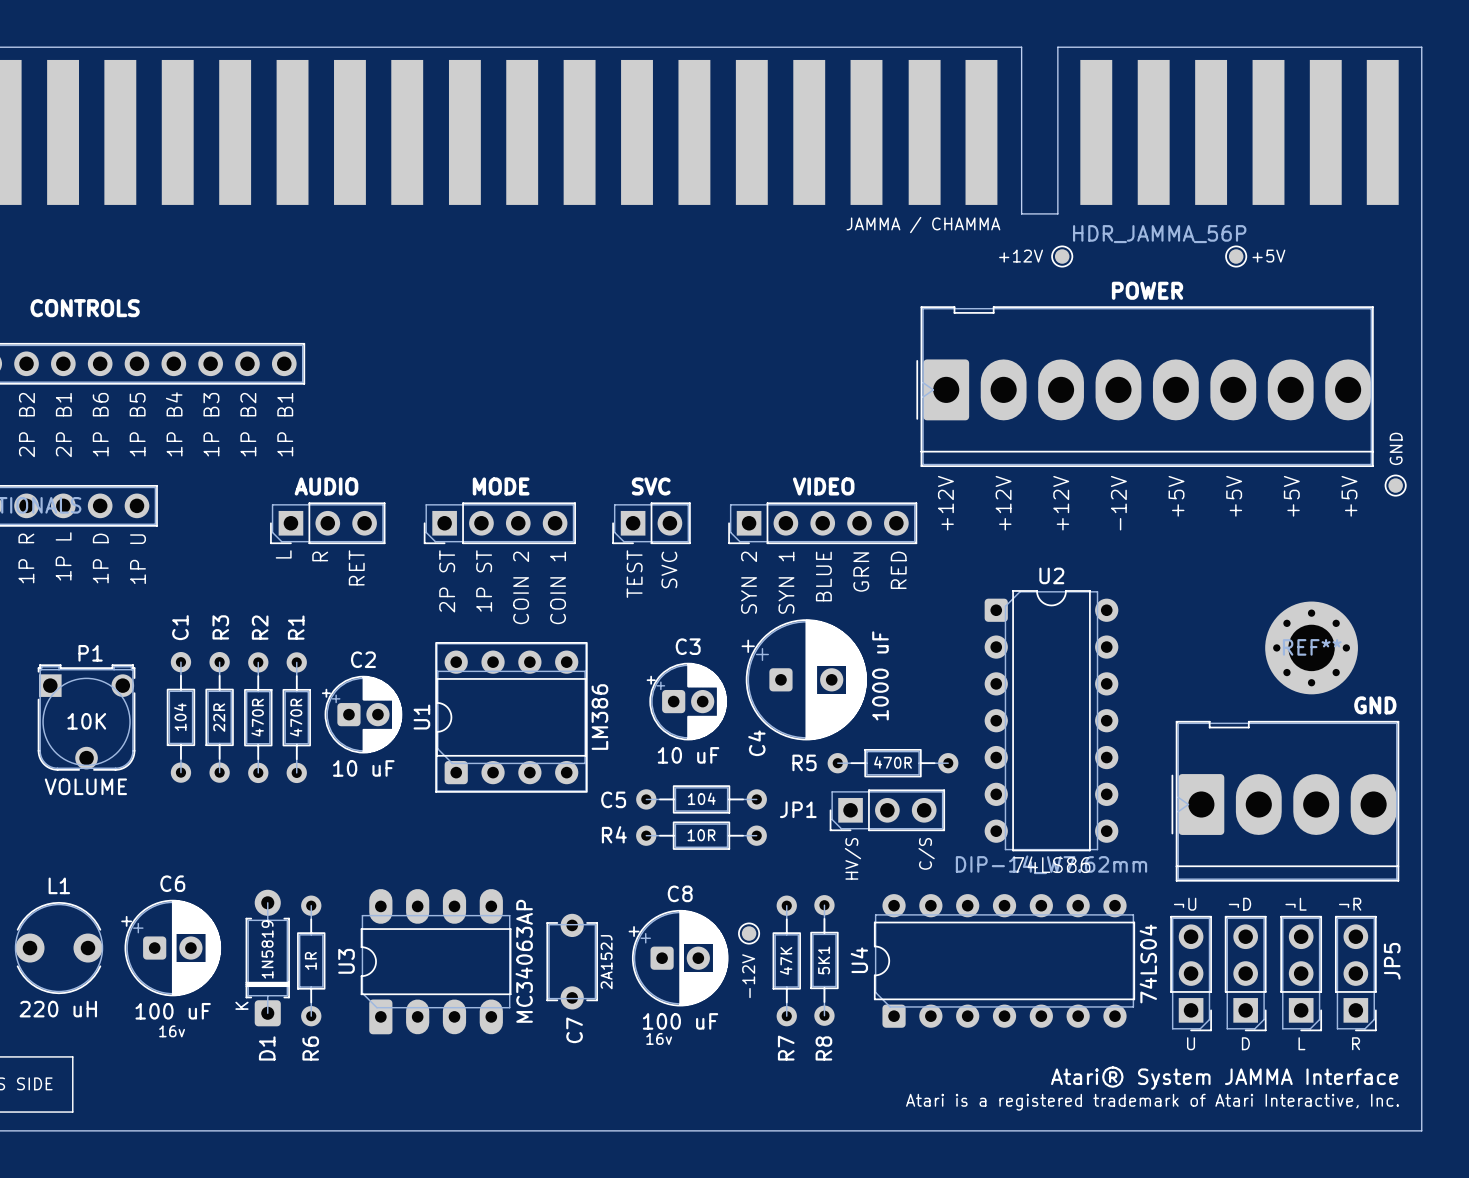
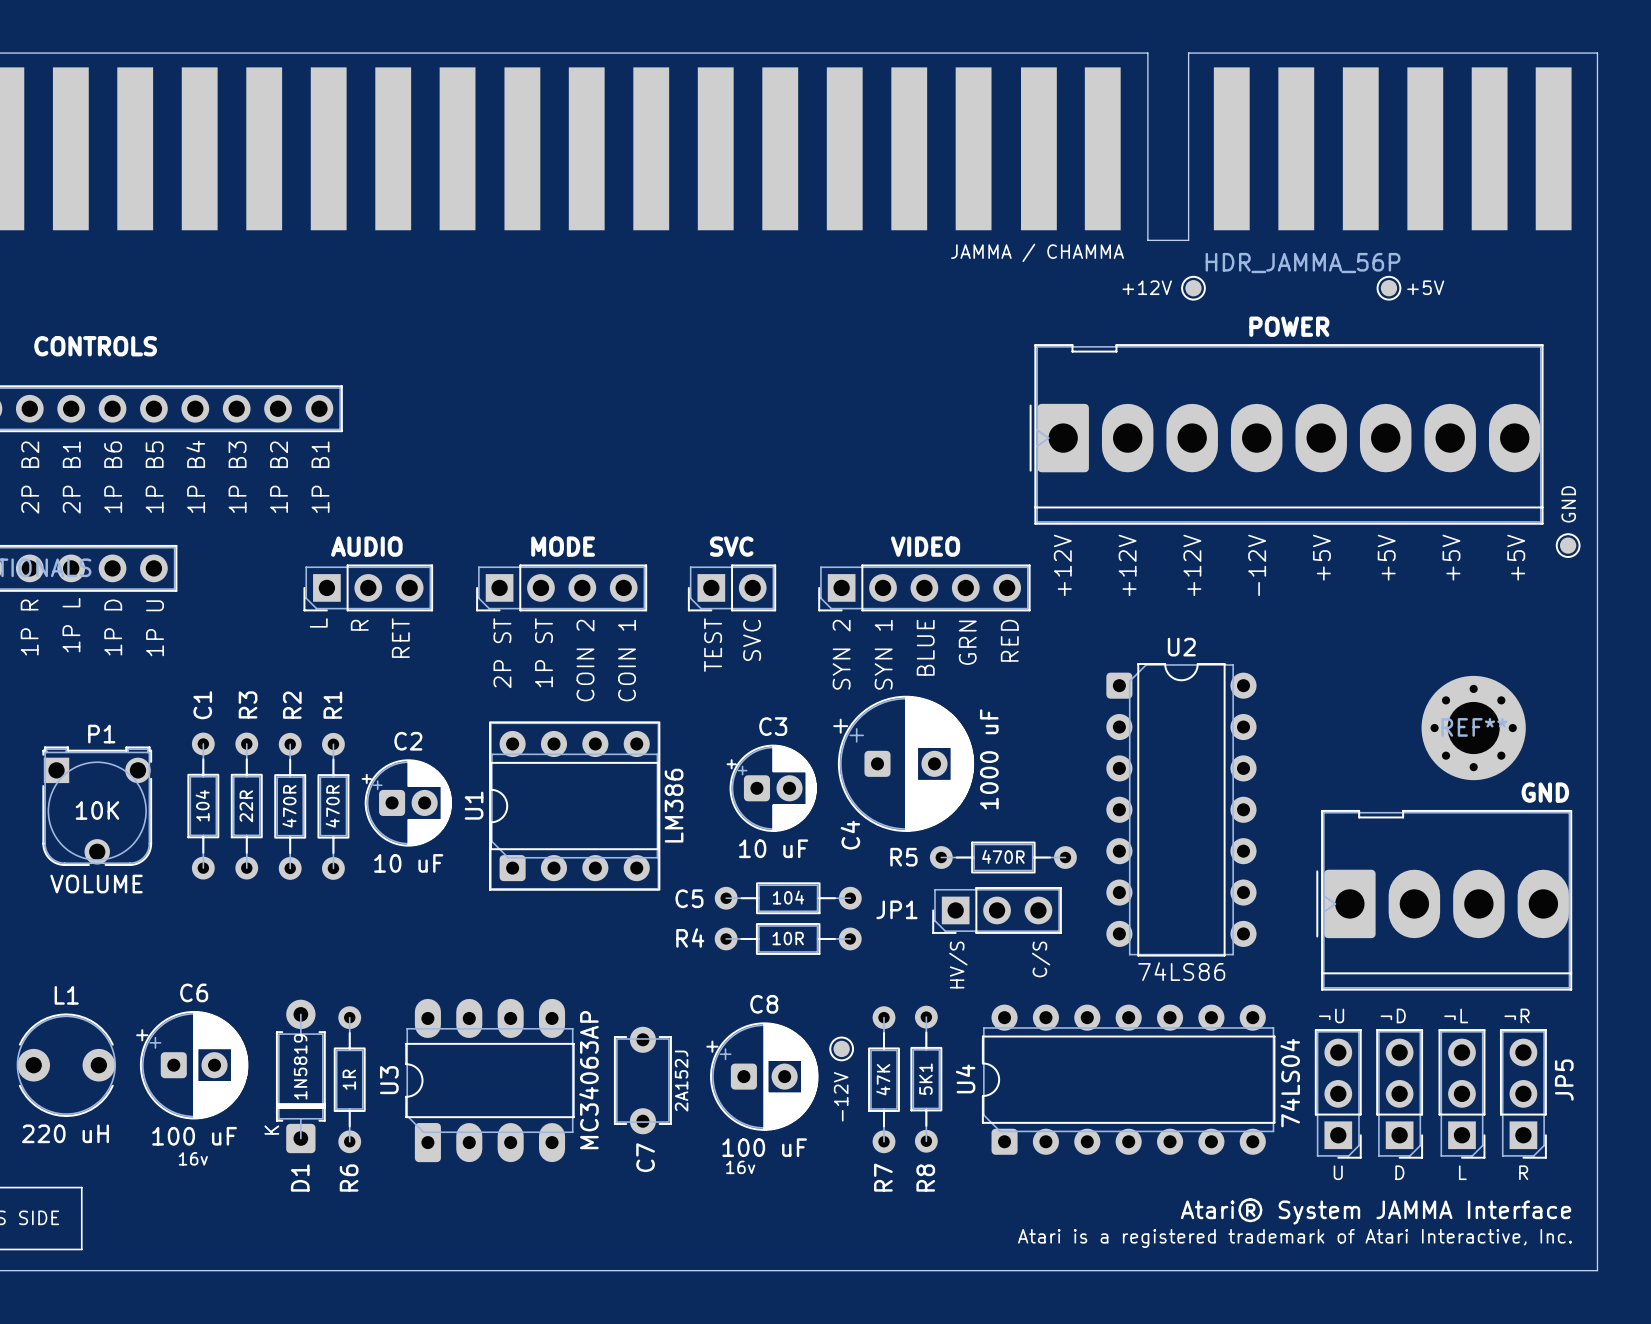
U2 value: DIP-14_W7.62mm (1051, 864) -> none

